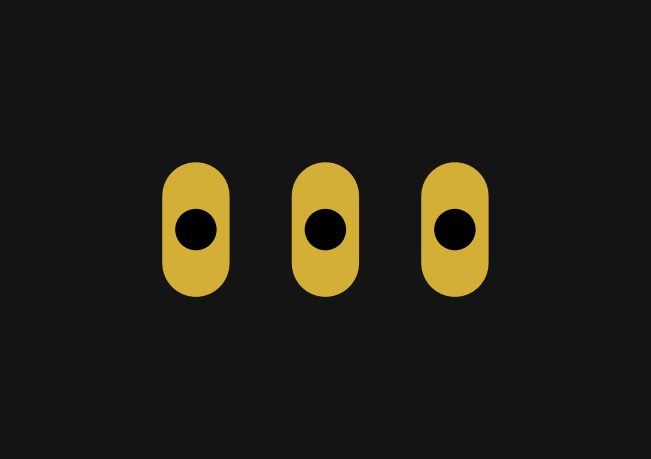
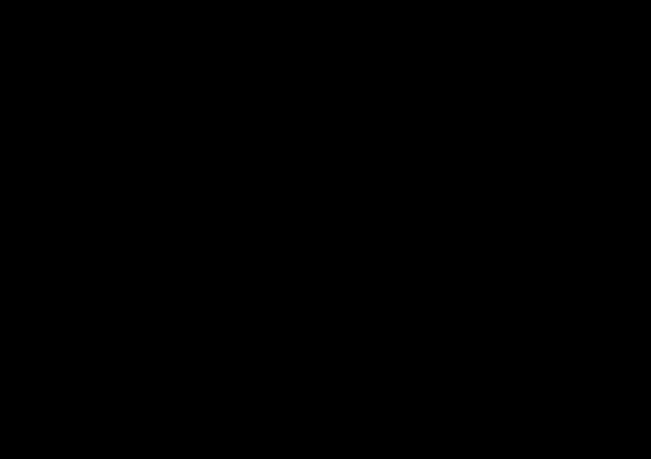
part: (325, 229) -> none

